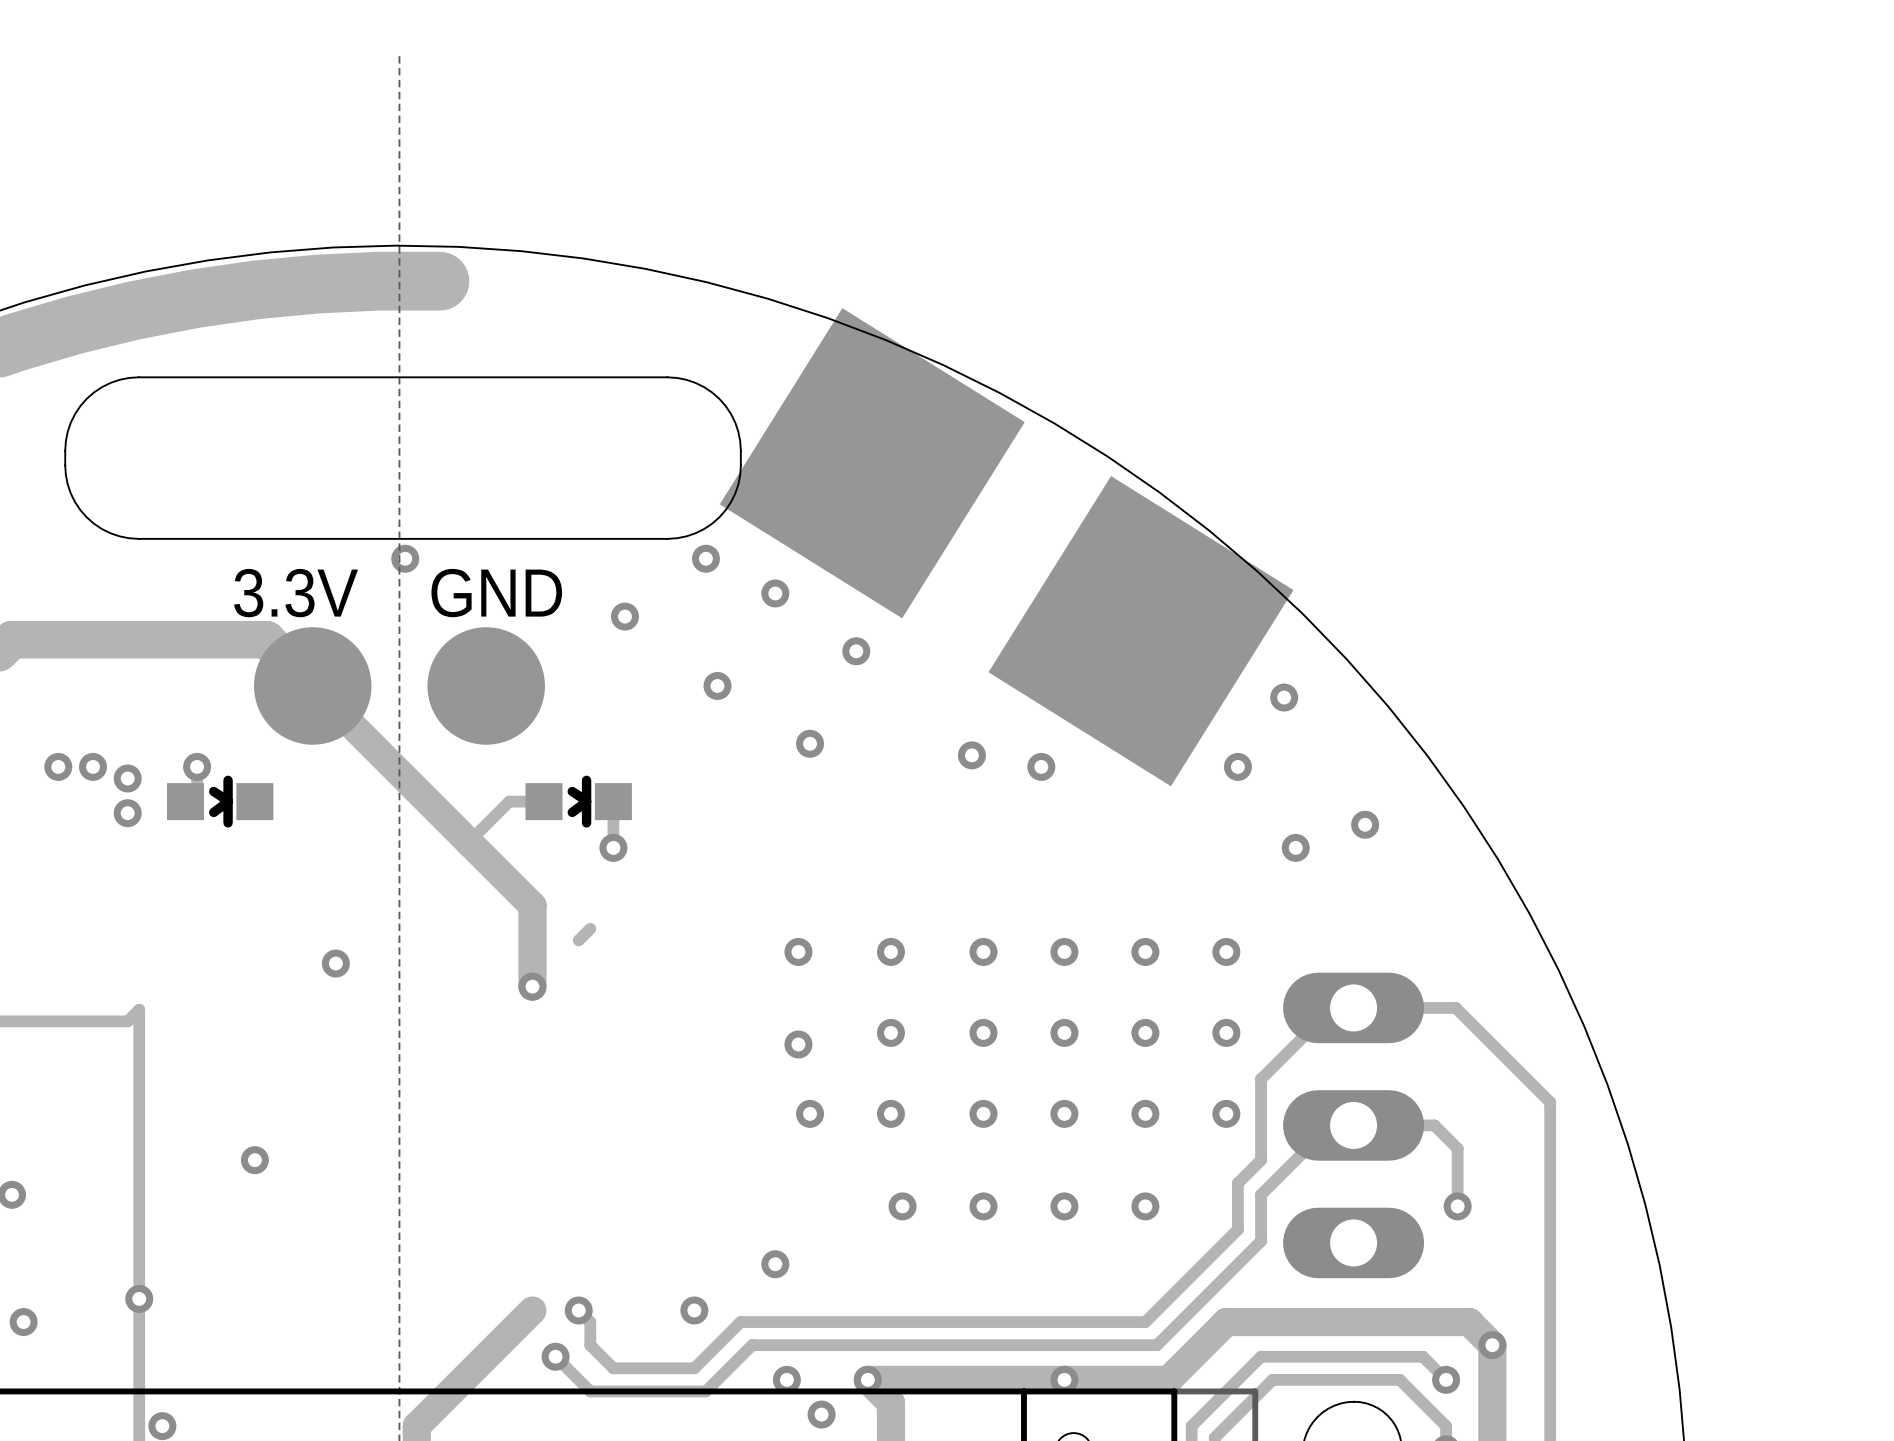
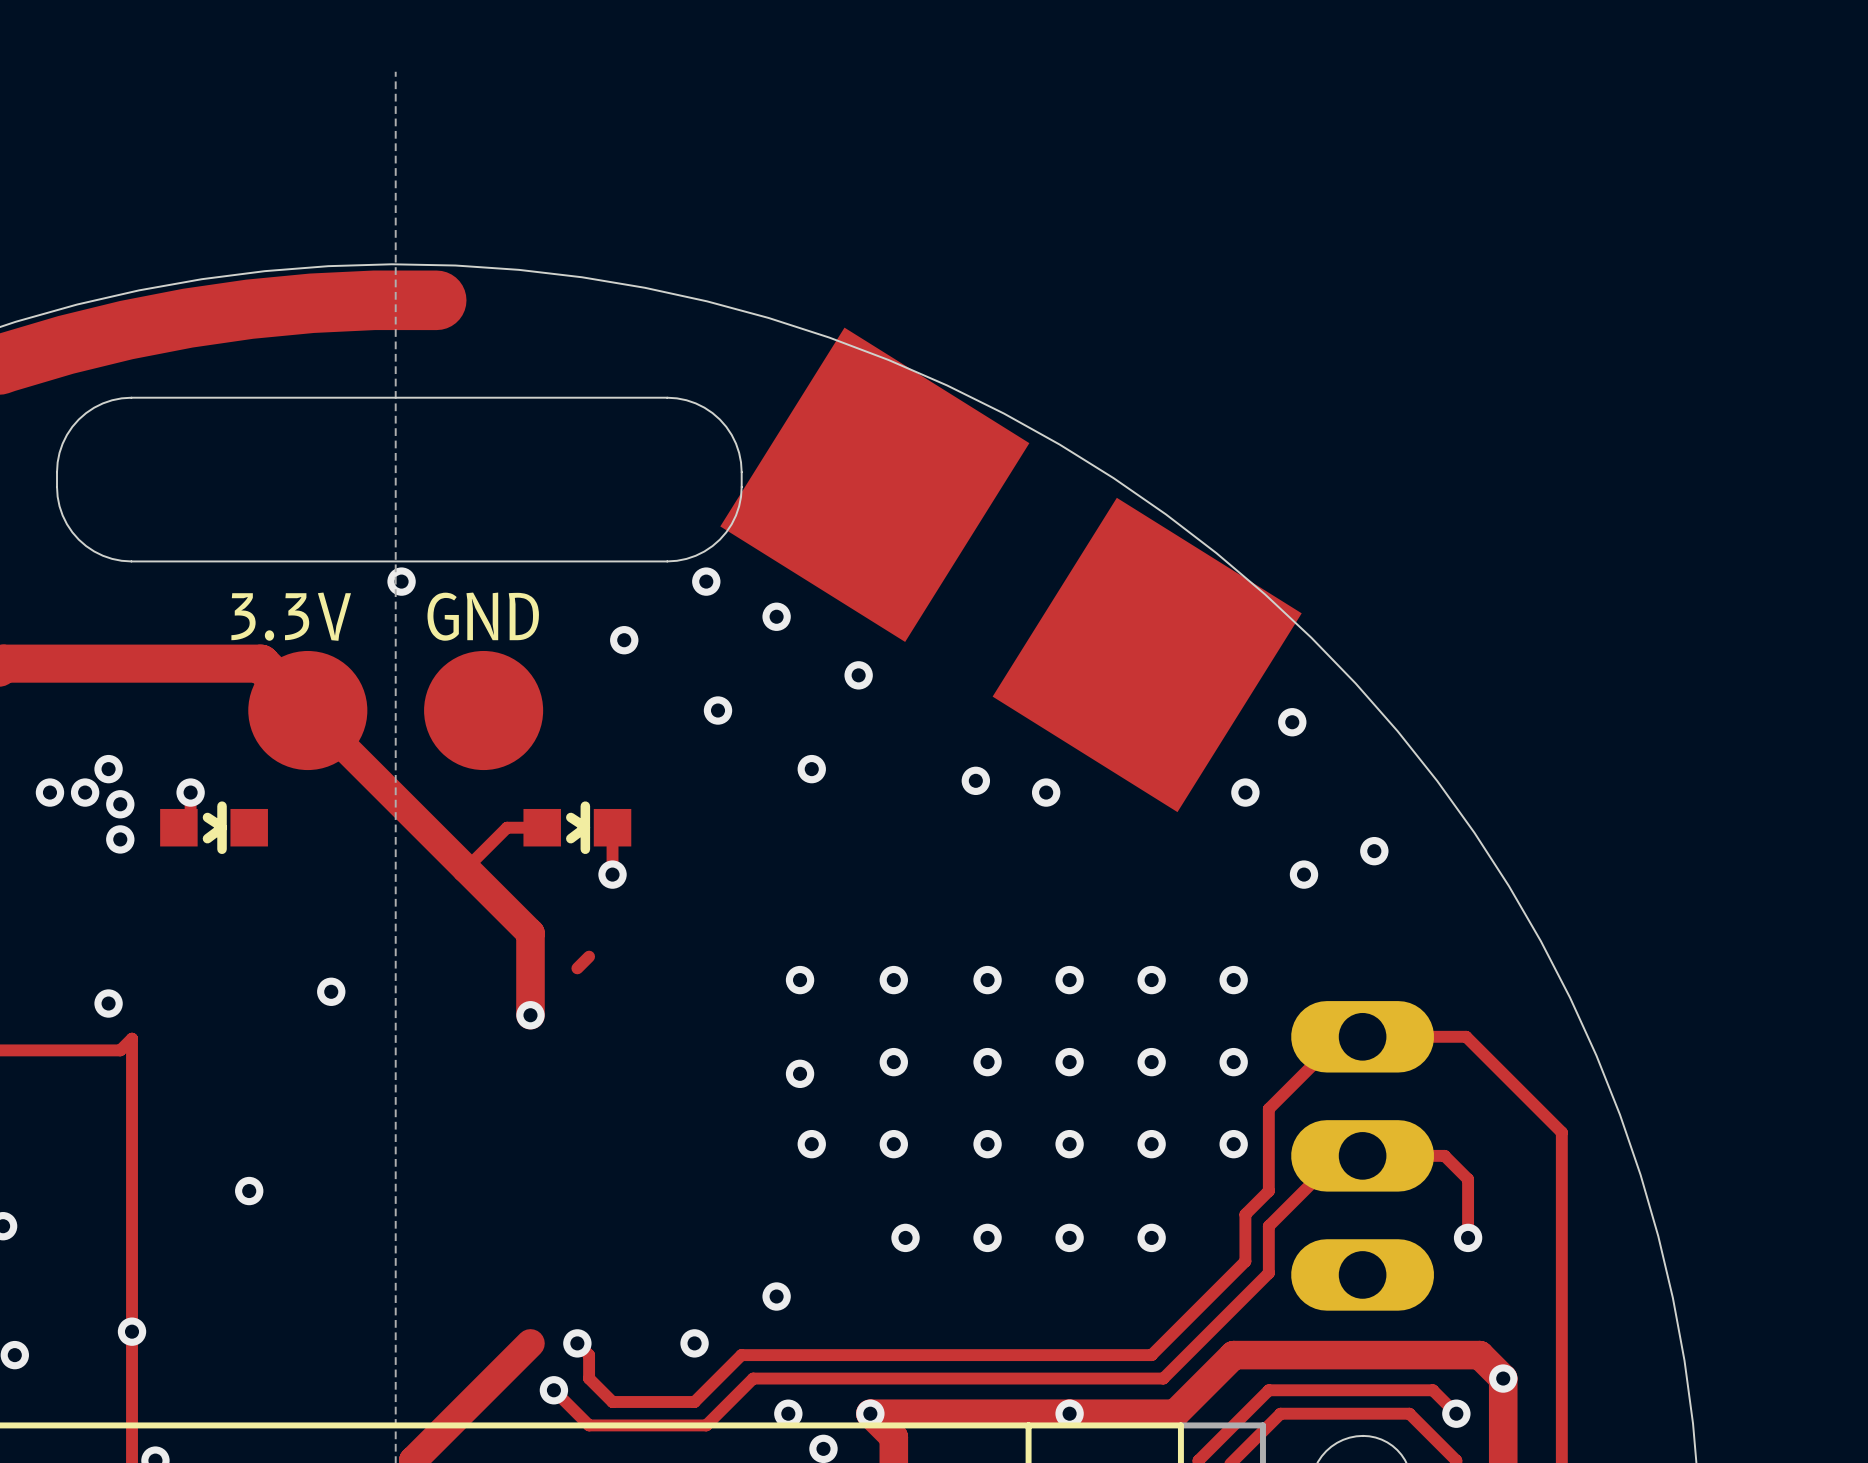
via: none -> (108, 769)
via: none -> (108, 1003)

